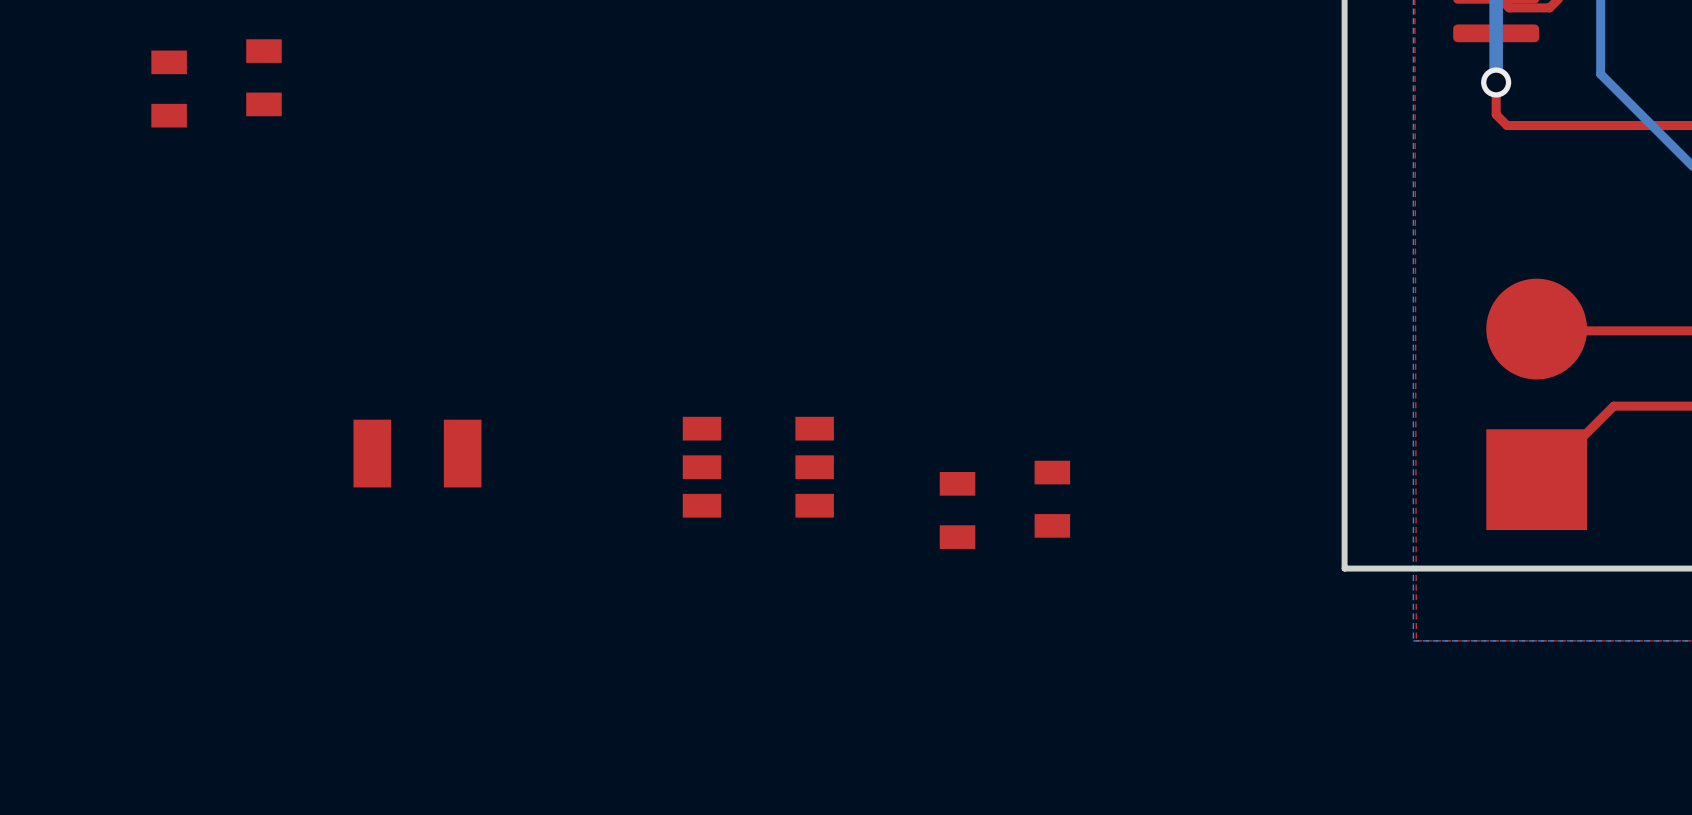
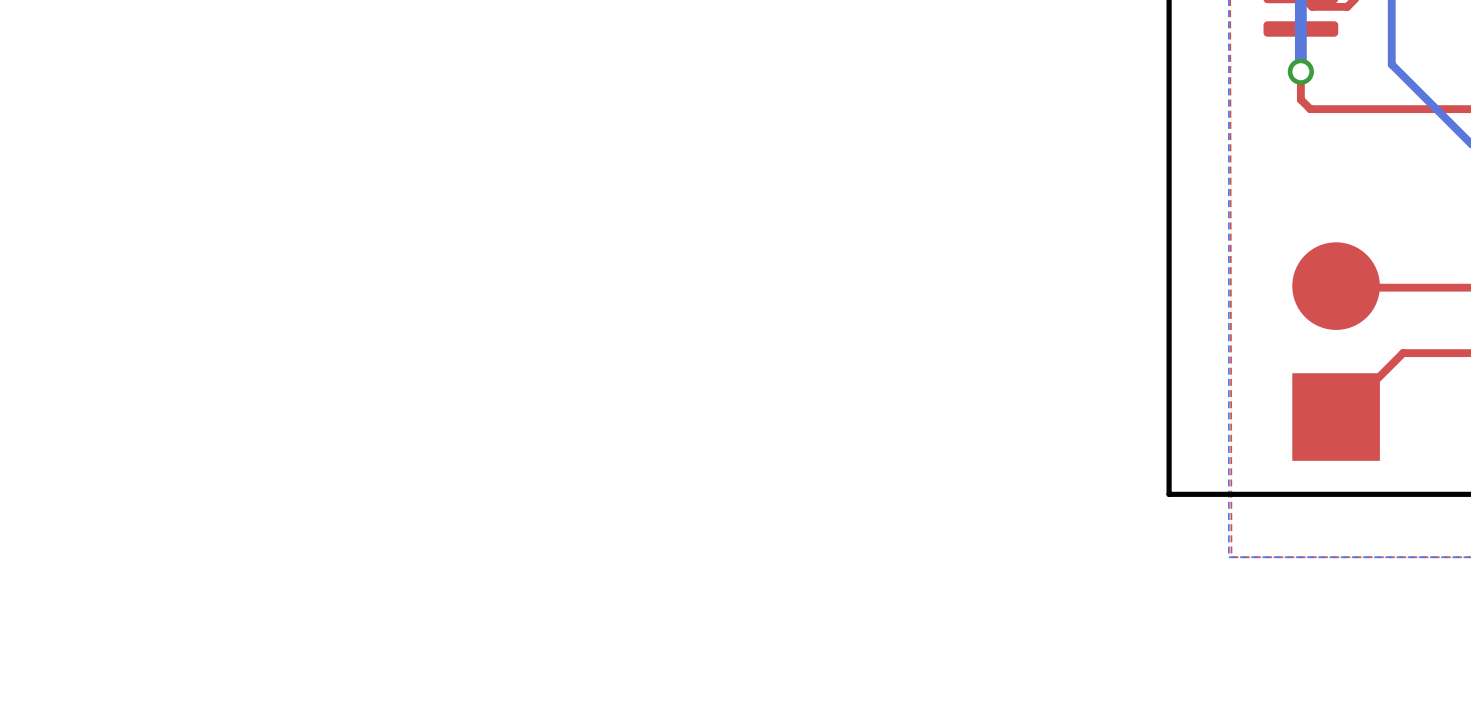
part: (263, 77) -> none
part: (169, 89) -> none
part: (417, 453) -> none
part: (758, 467) -> none
part: (1052, 499) -> none
part: (957, 510) -> none

